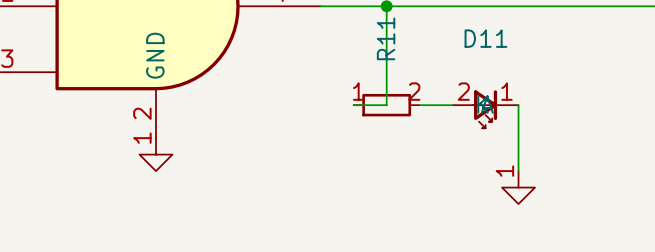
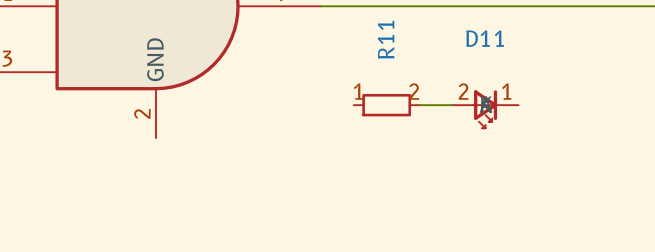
wire: (386, 6) (386, 105) (353, 105) -> none
junction: (386, 6) -> none
wire: (518, 105) (518, 171) -> none
power symbol: (155, 154) -> none
power symbol: (518, 187) -> none

